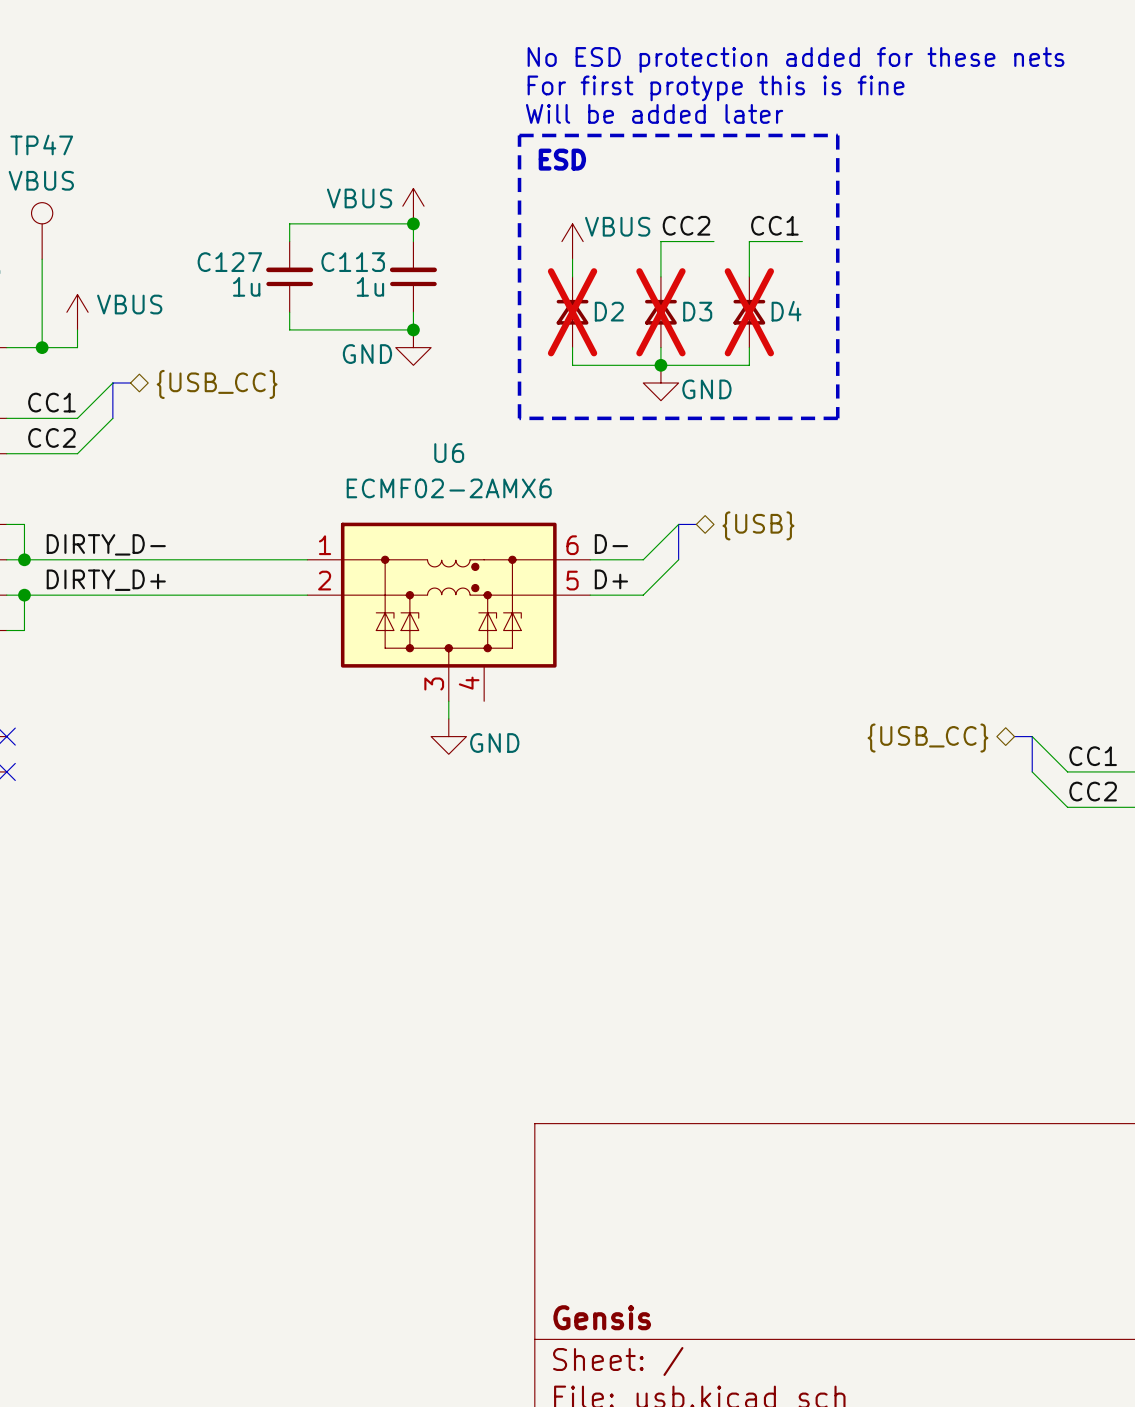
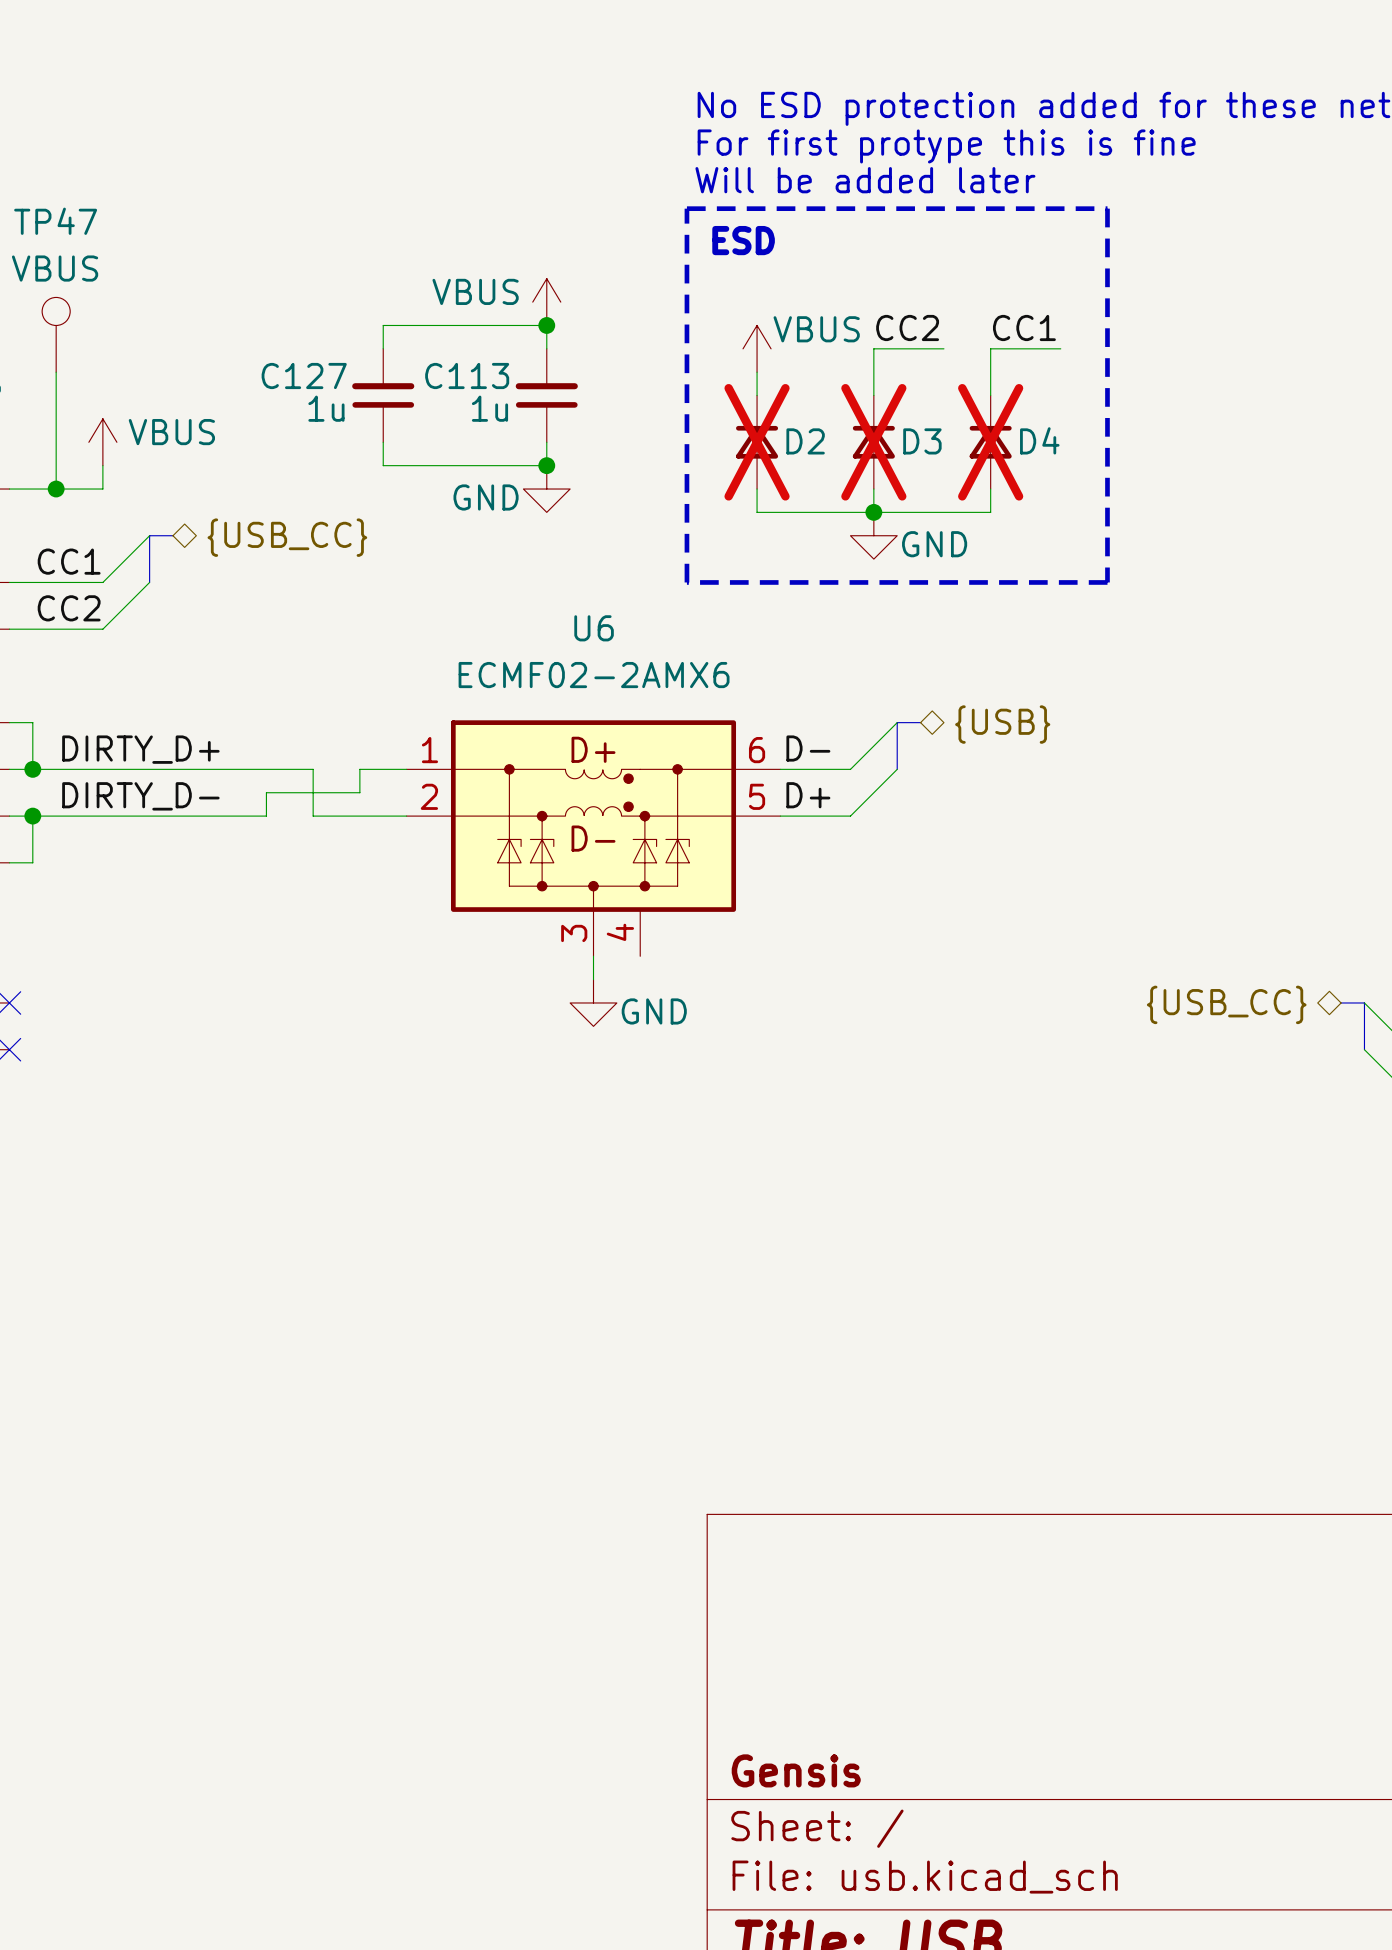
label: DIRTY_D- (106, 544) -> DIRTY_D+ (140, 749)
U6 text: none -> D+ (593, 749)
wire: (236, 559) (271, 559) -> (266, 816) (266, 792) (359, 792) (359, 769)
label: DIRTY_D+ (106, 580) -> DIRTY_D- (140, 796)
wire: (201, 595) (236, 595) -> (313, 769) (313, 816)
U6 text: none -> D- (593, 838)

